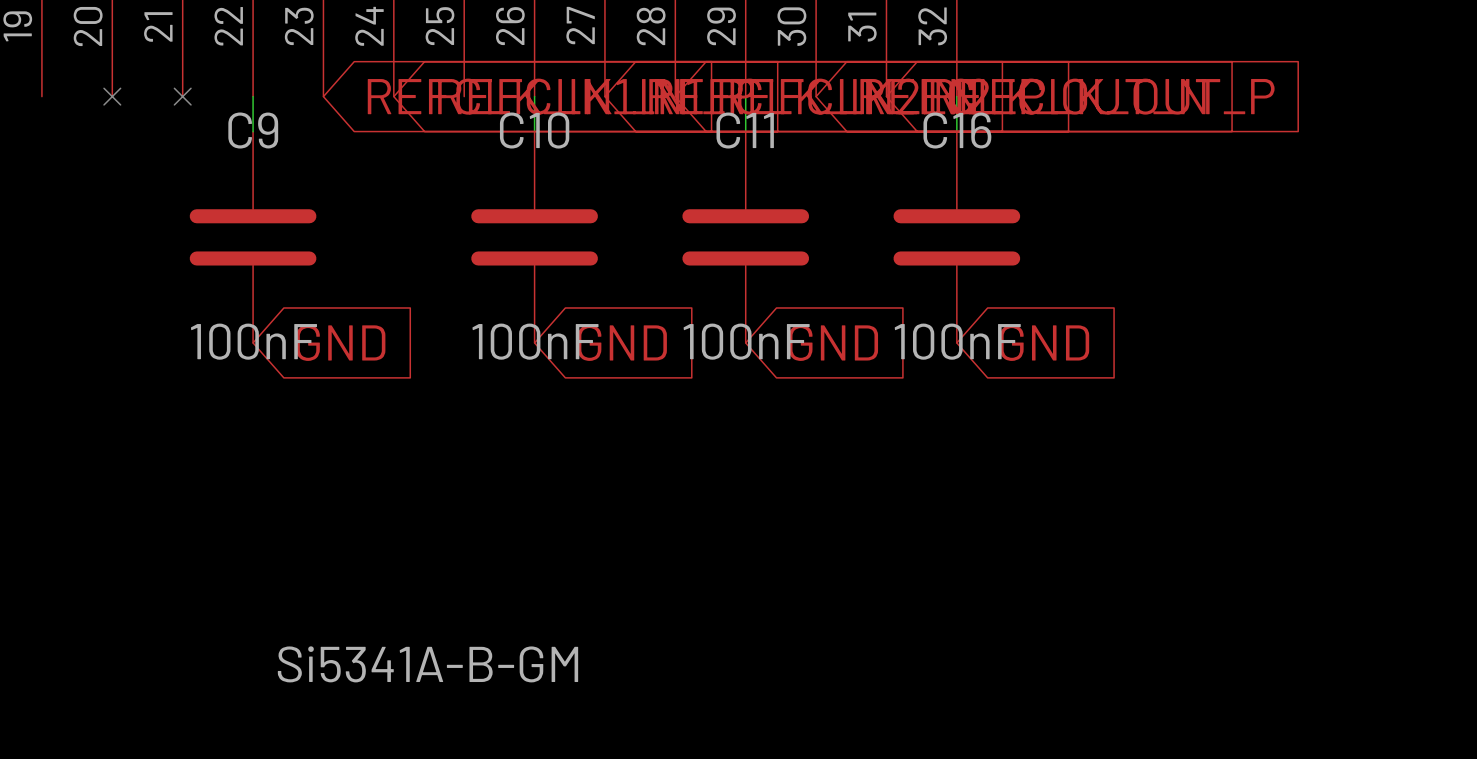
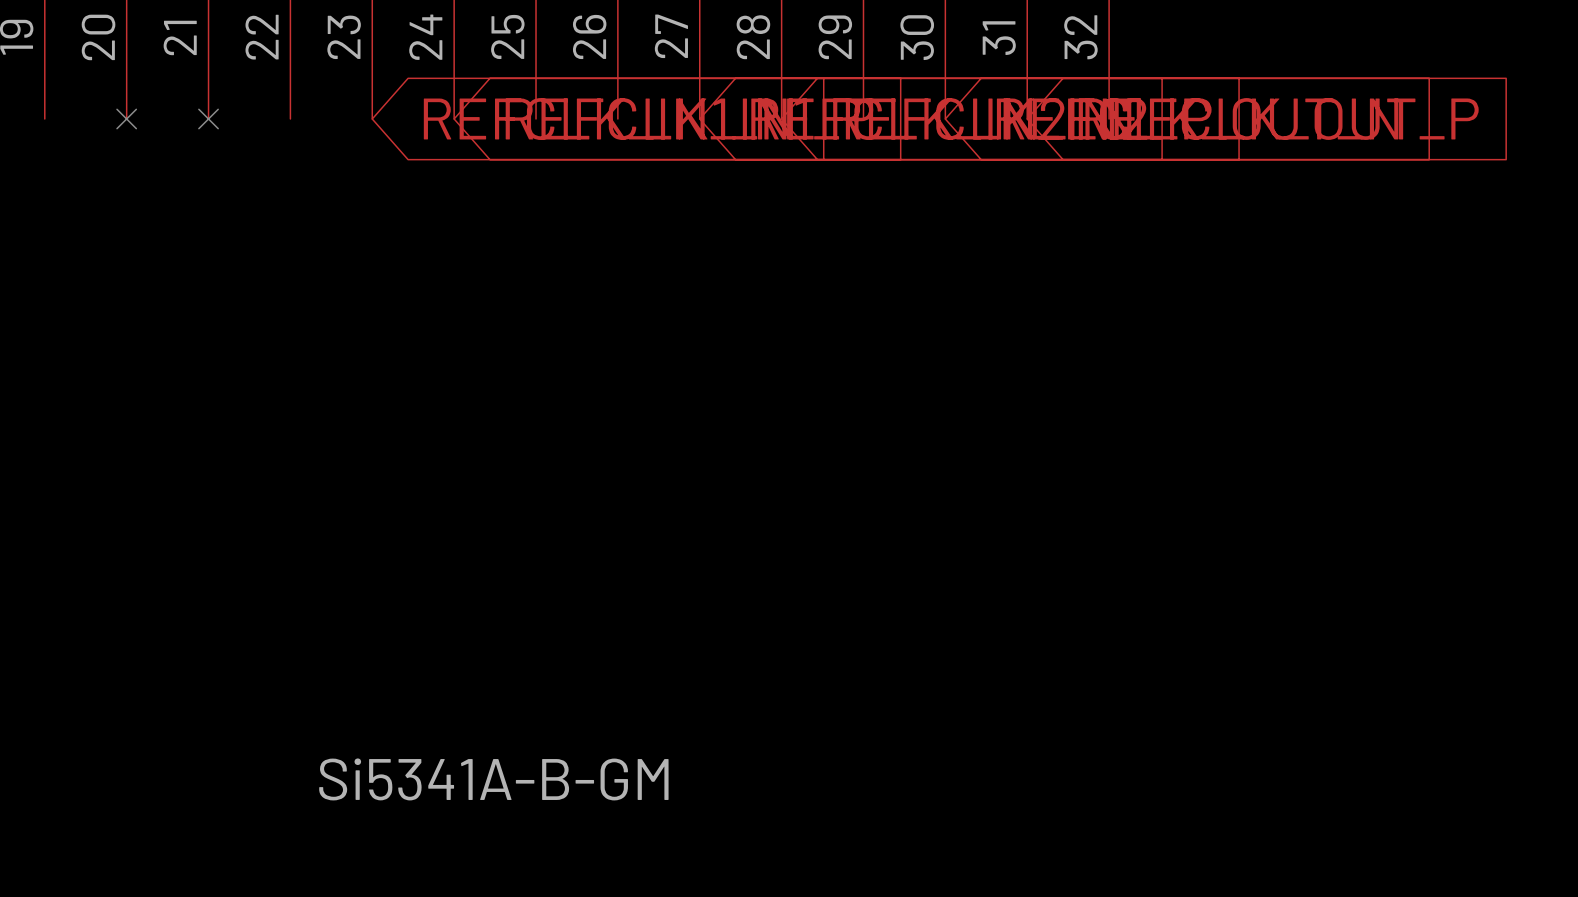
wire: (253, 96) (253, 131) -> none
wire: (534, 96) (534, 131) -> none
wire: (745, 96) (745, 131) -> none
wire: (956, 96) (956, 131) -> none
C9: 100nF (253, 237) -> none
C10: 100nF (534, 237) -> none
C11: 100nF (745, 237) -> none
C16: 100nF (956, 237) -> none
global label: GND (340, 342) -> none
global label: GND (622, 342) -> none
global label: GND (833, 342) -> none
global label: GND (1044, 342) -> none

